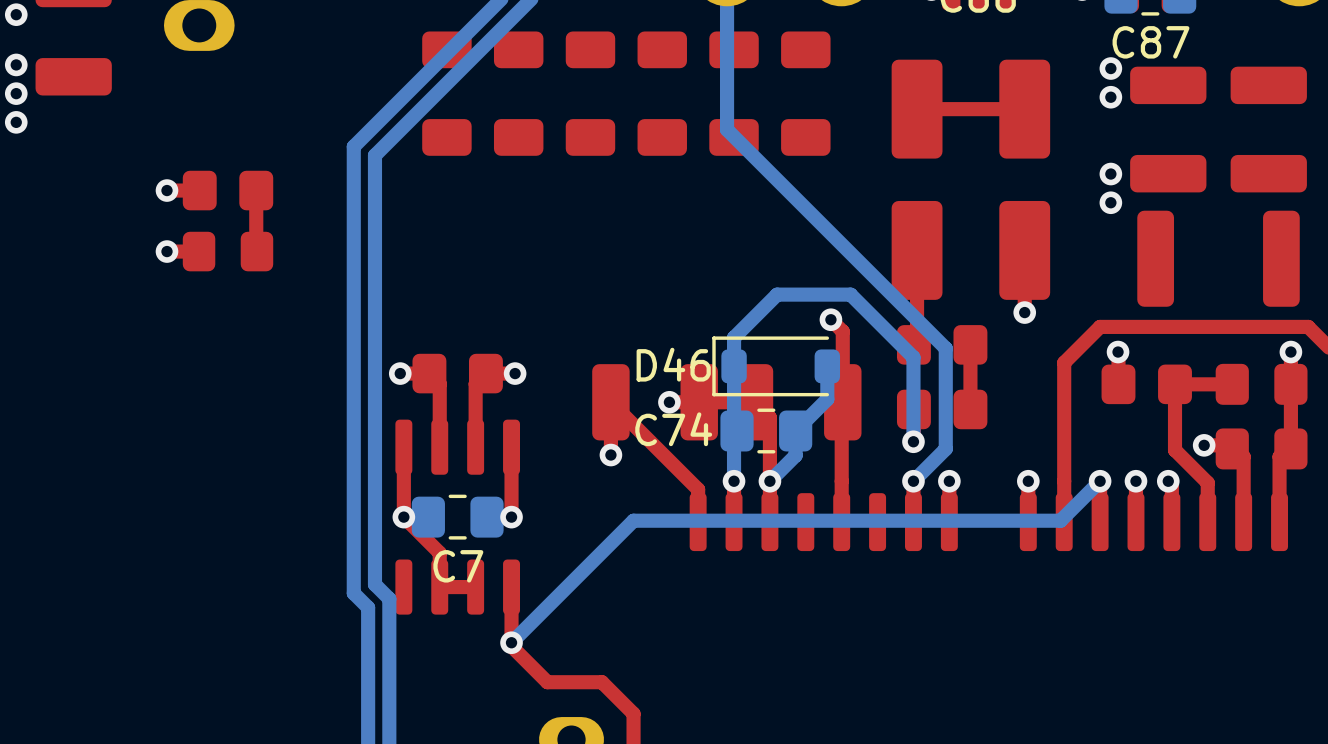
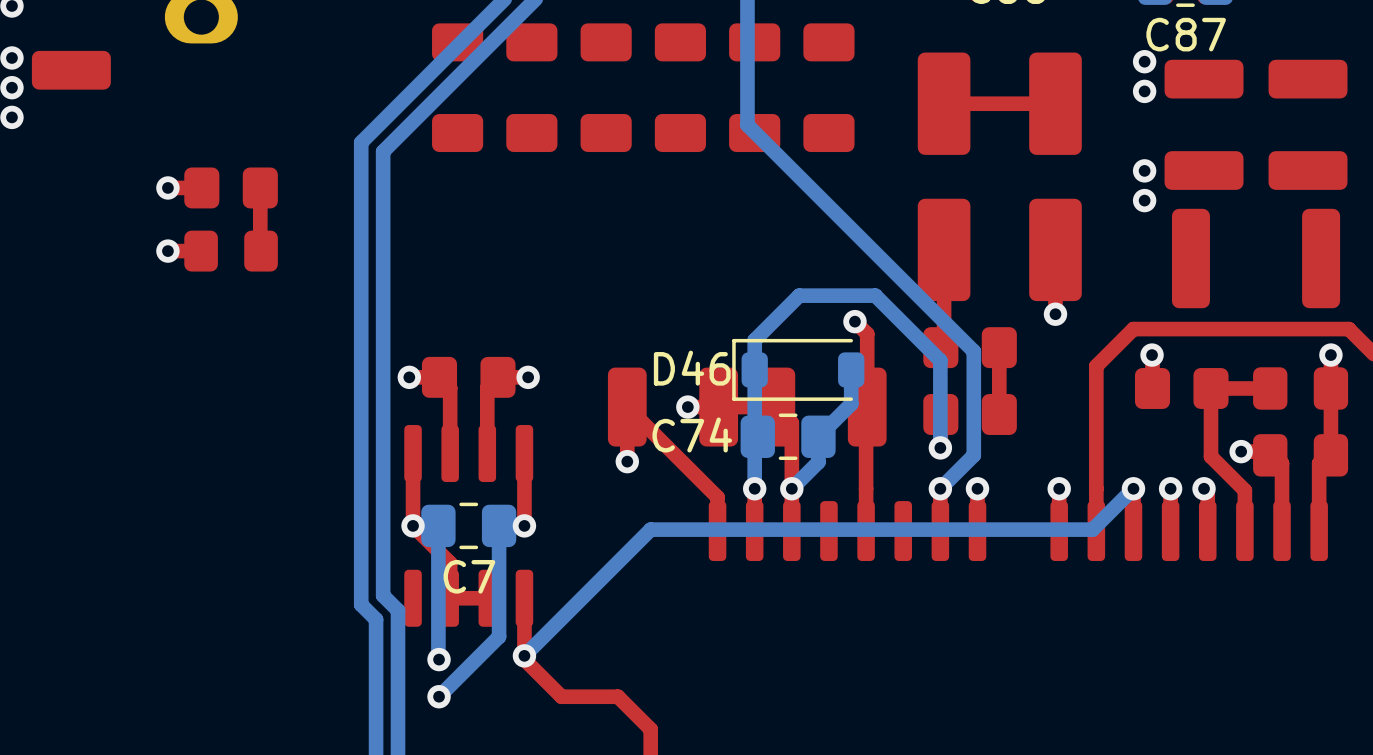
bottom track: none -> (438, 525) (439, 659)
bottom track: none -> (499, 525) (499, 636) (439, 696)
via: none -> (439, 659)
via: none -> (439, 696)

